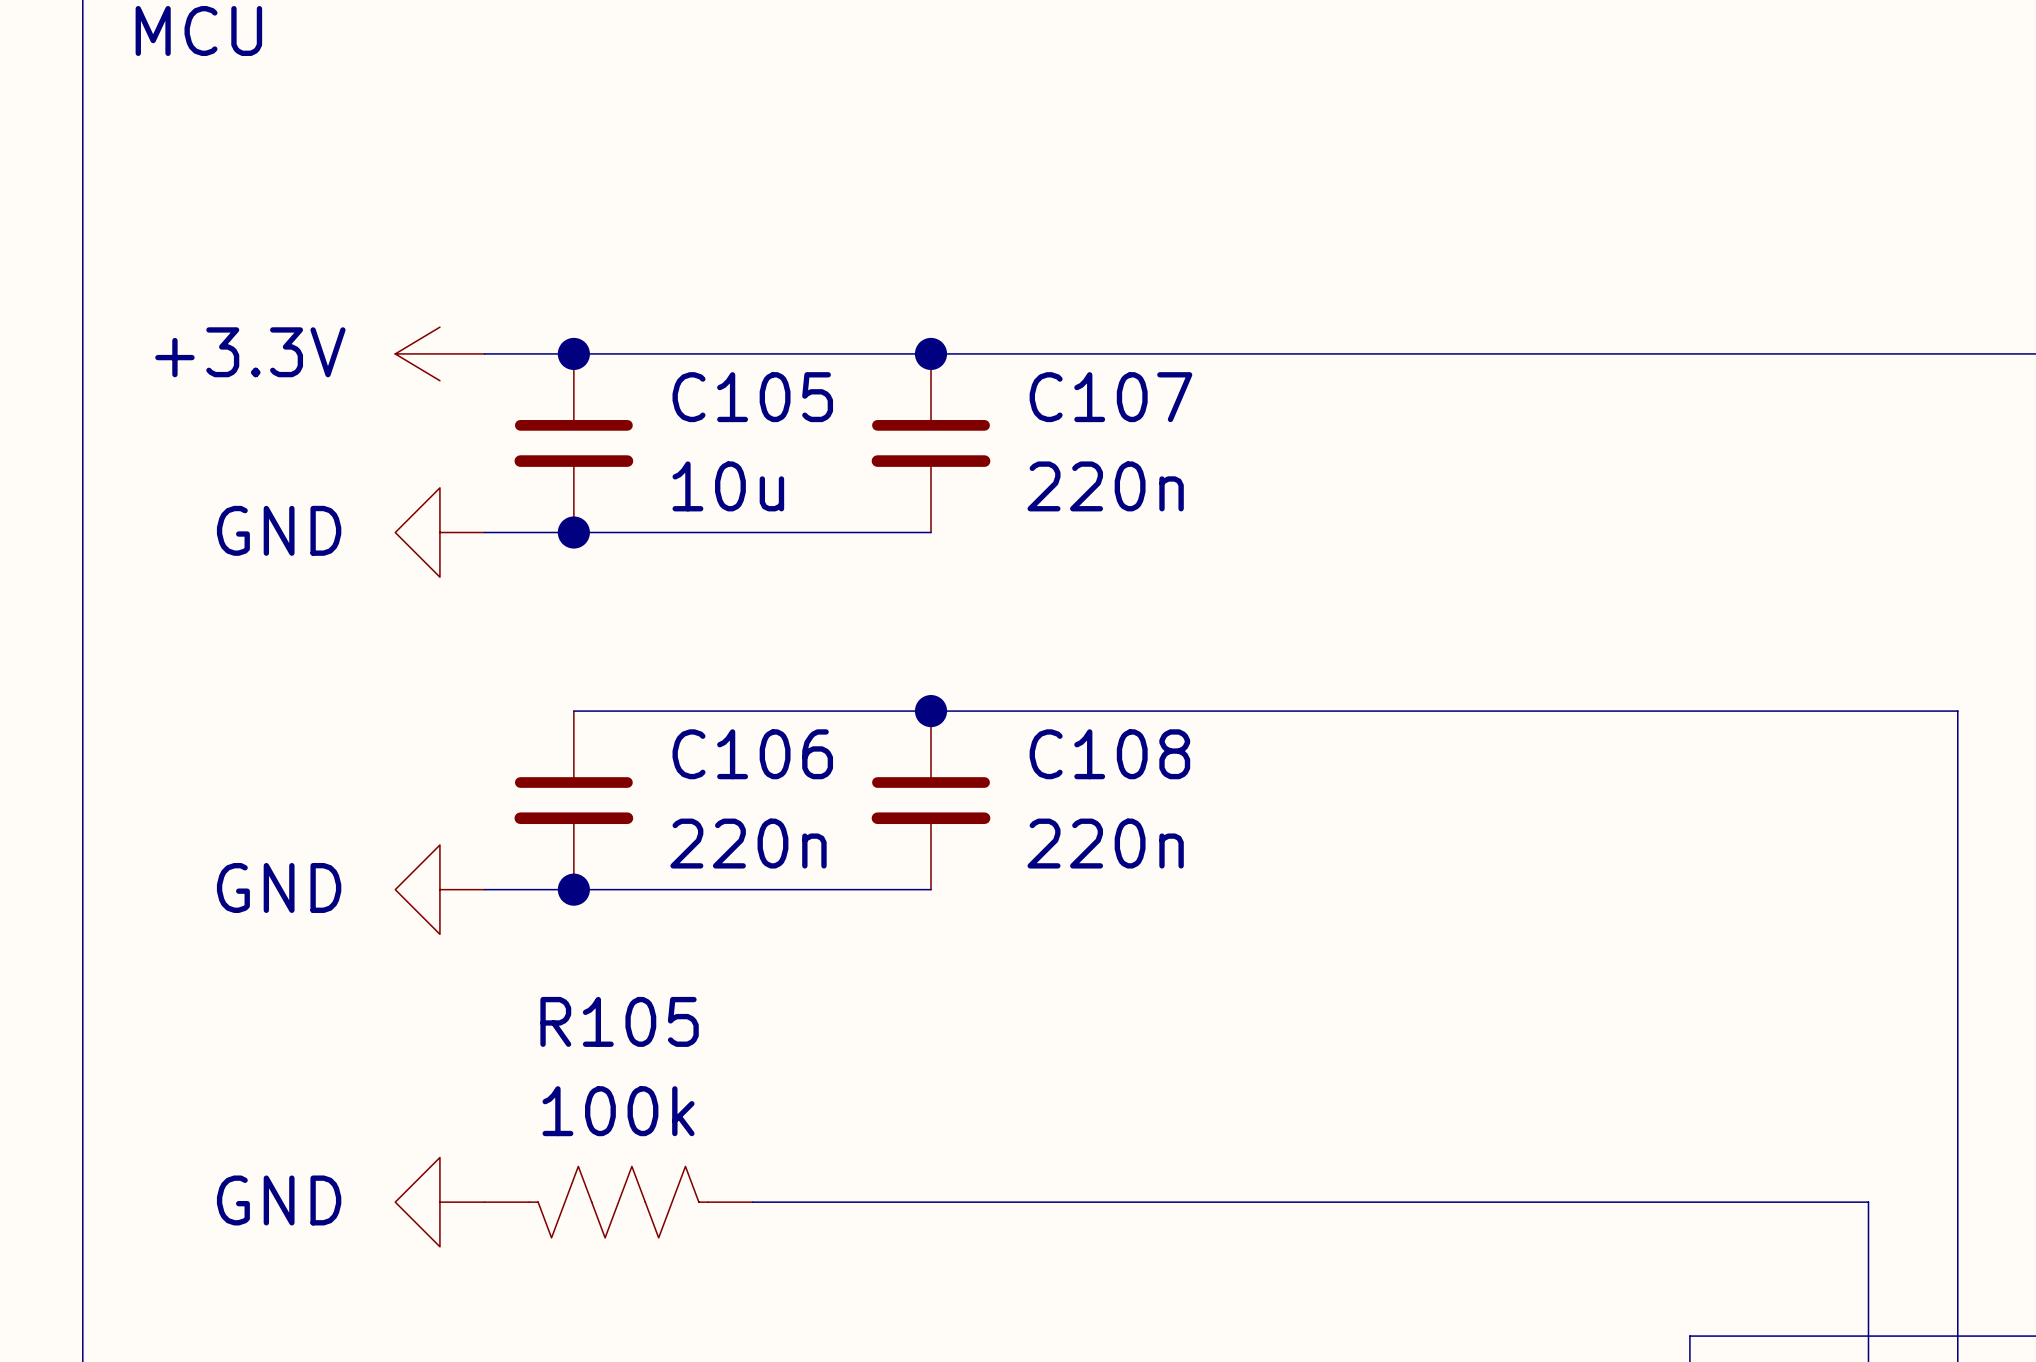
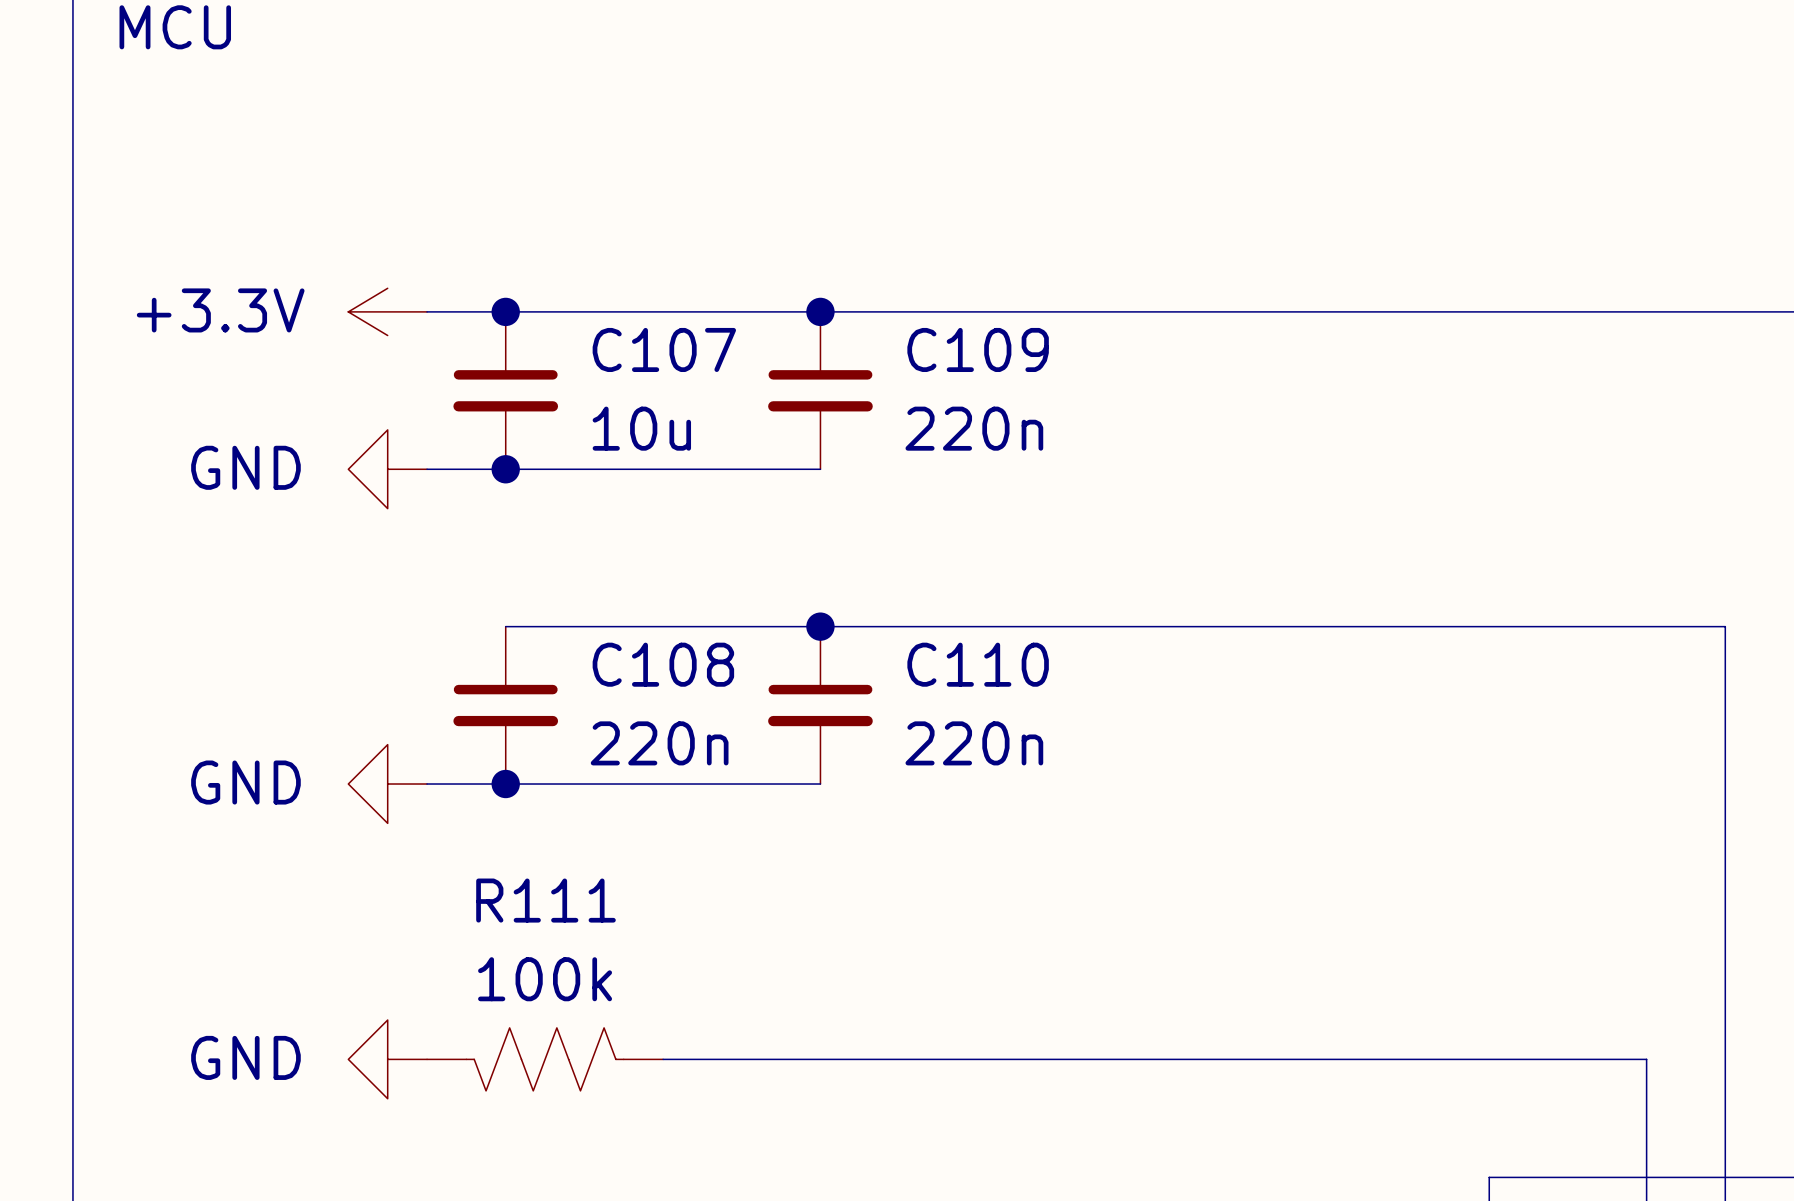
C105 name: C105 (752, 397) -> C107 (664, 349)
C107 name: C107 (1110, 397) -> C109 (978, 349)
C106 name: C106 (752, 754) -> C108 (663, 664)
C108 name: C108 (1109, 754) -> C110 (978, 664)
R105 name: R105 (619, 1021) -> R111 (546, 900)

